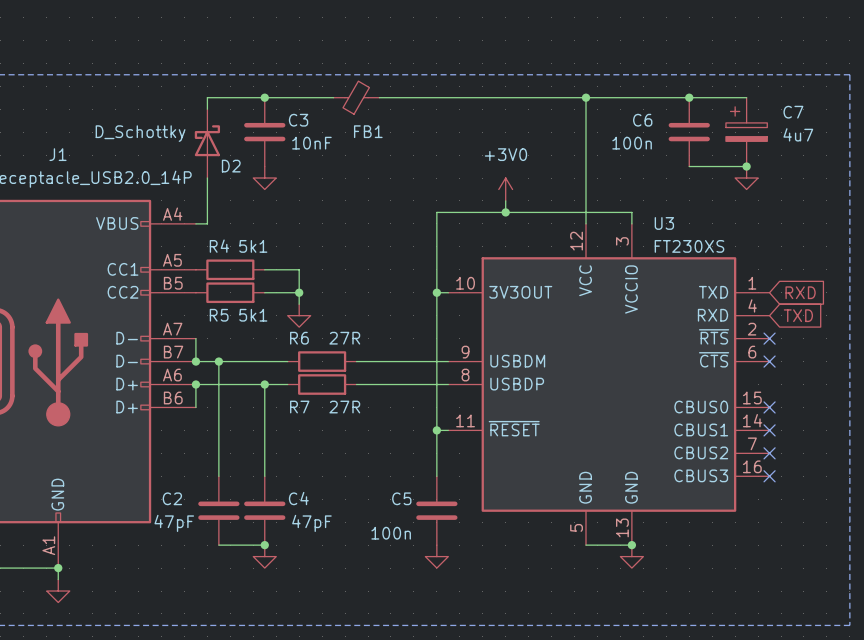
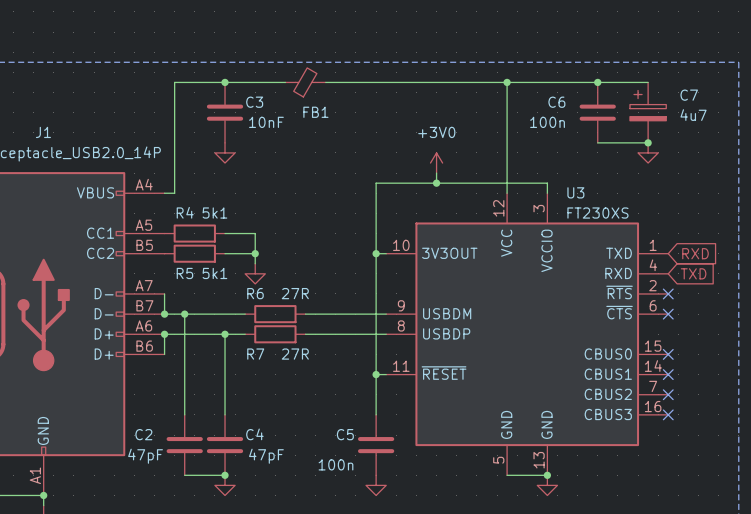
D2: D_Schottky (207, 143) -> none

